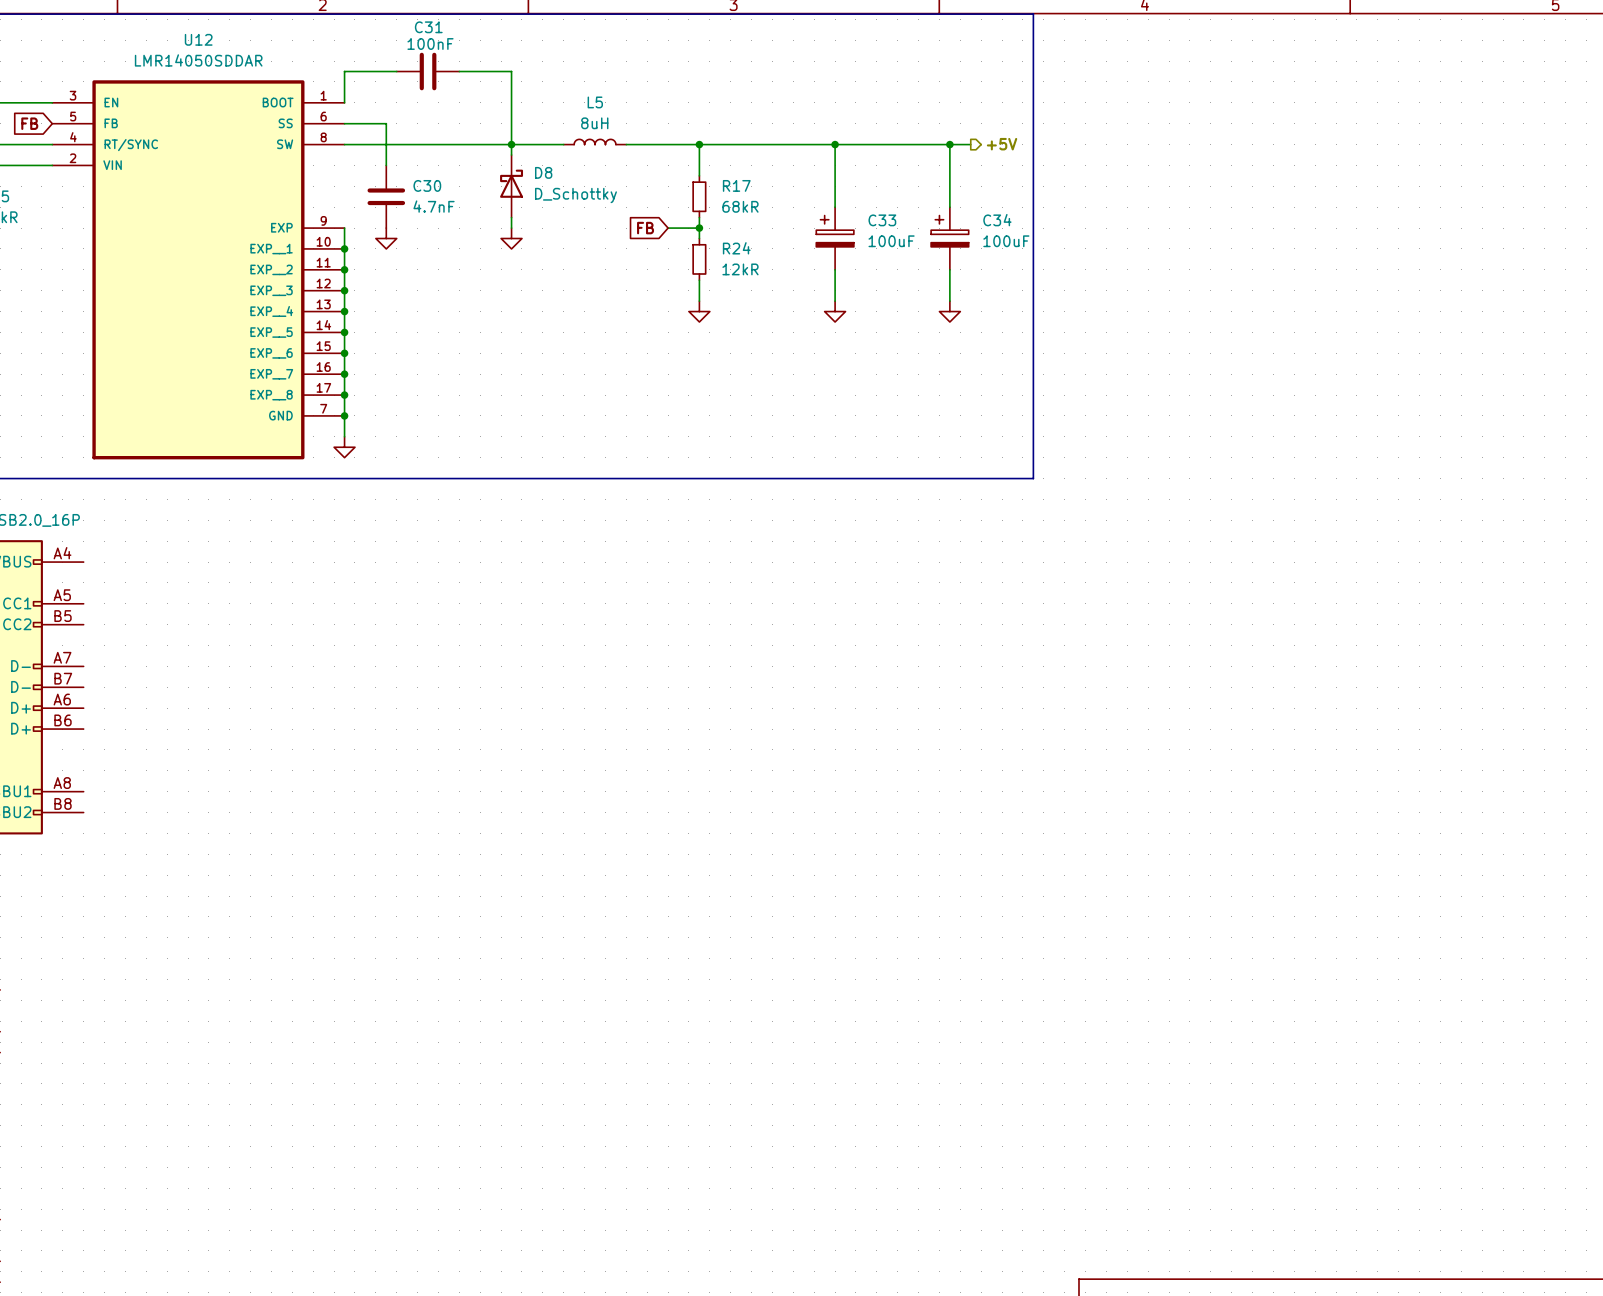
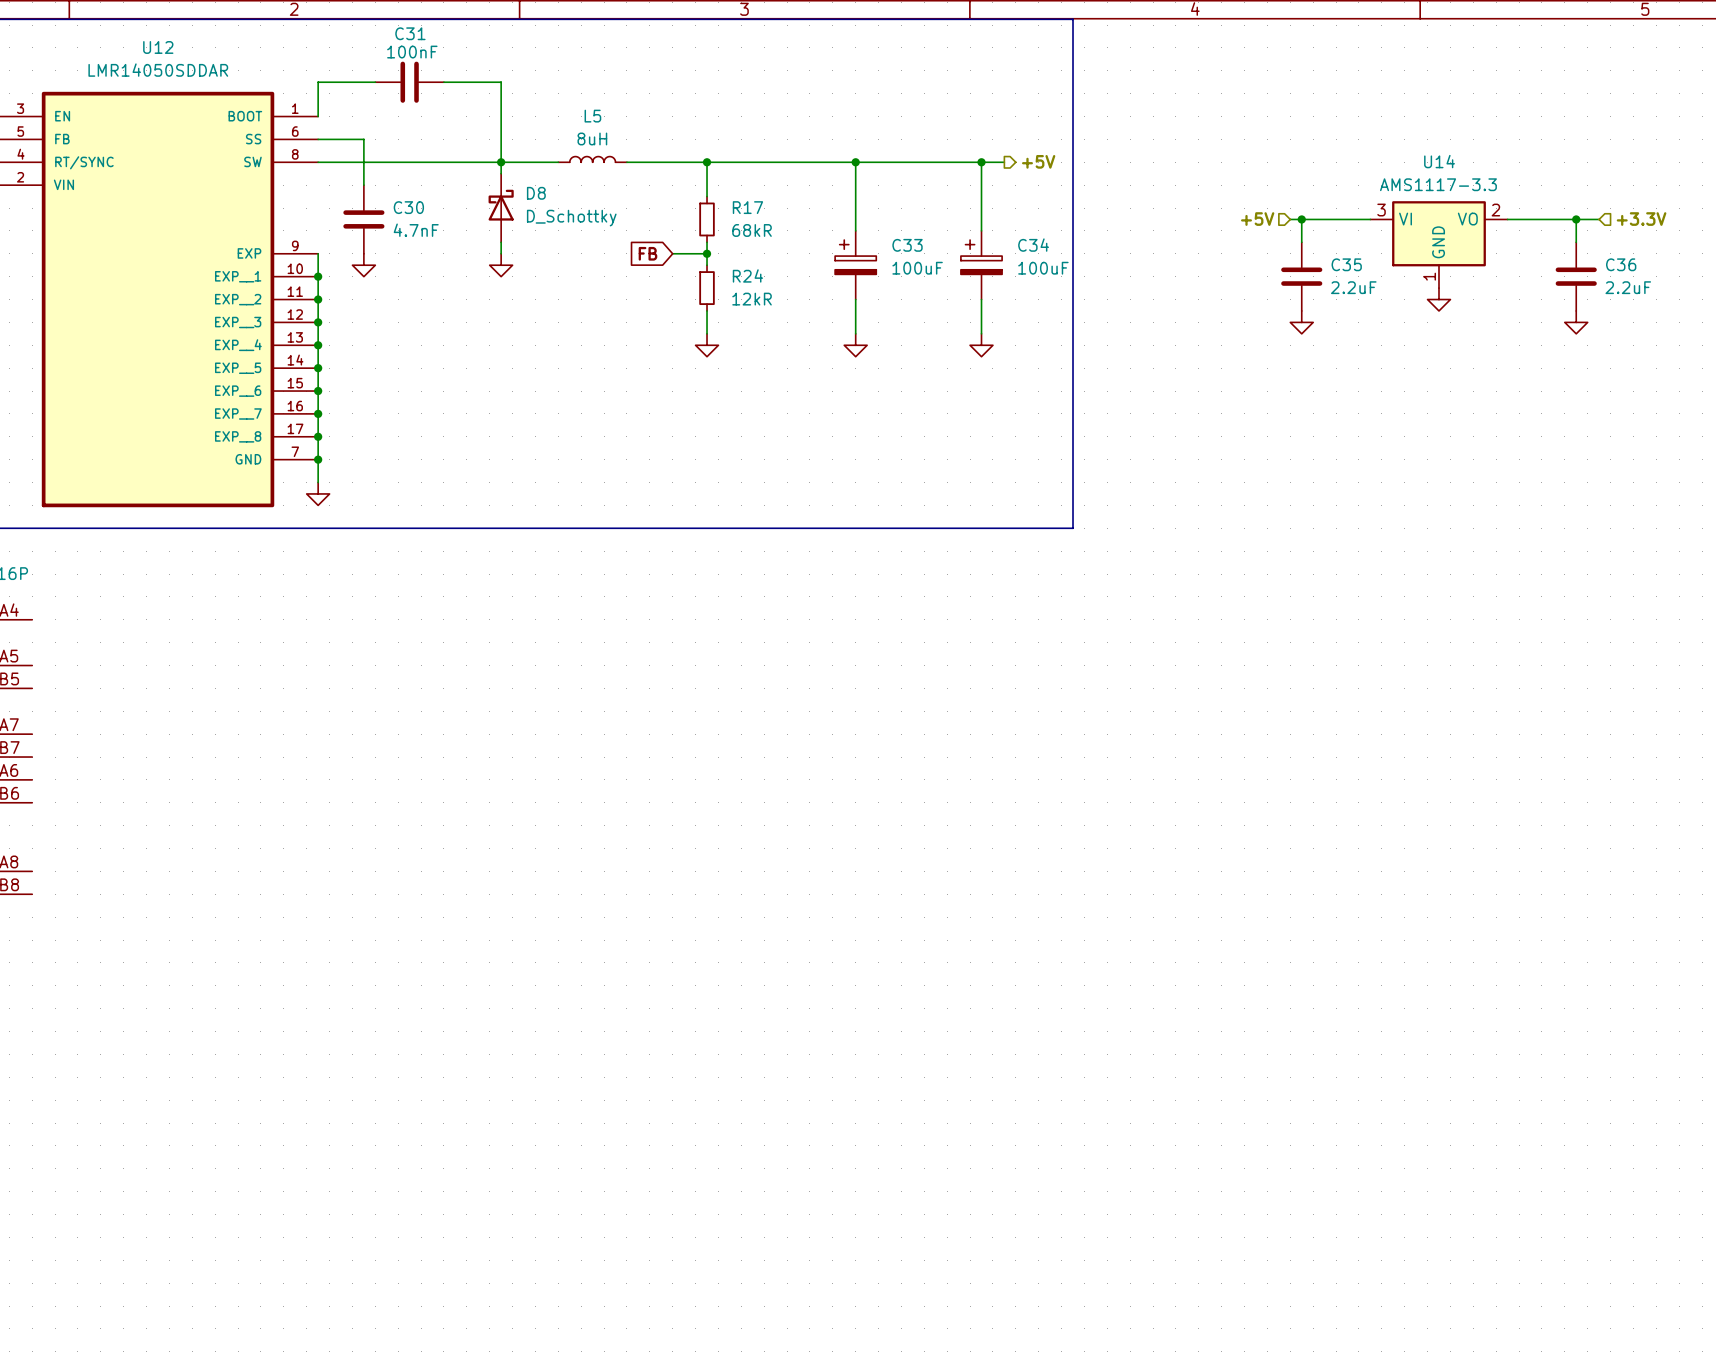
hierarchical label: none -> +5V (1257, 219)
wire: none -> (1290, 219) (1370, 219)
wire: none -> (1301, 219) (1301, 242)
junction: none -> (1301, 219)
wire: none -> (1507, 219) (1599, 219)
wire: none -> (1576, 219) (1576, 242)
junction: none -> (1576, 219)
hierarchical label: none -> +3.3V (1641, 219)
U14: none -> AMS1117-3.3 (1438, 244)
C35: none -> 2.2uF (1301, 276)
C36: none -> 2.2uF (1576, 276)
power symbol: none -> (1438, 299)
power symbol: none -> (1301, 322)
power symbol: none -> (1576, 322)

